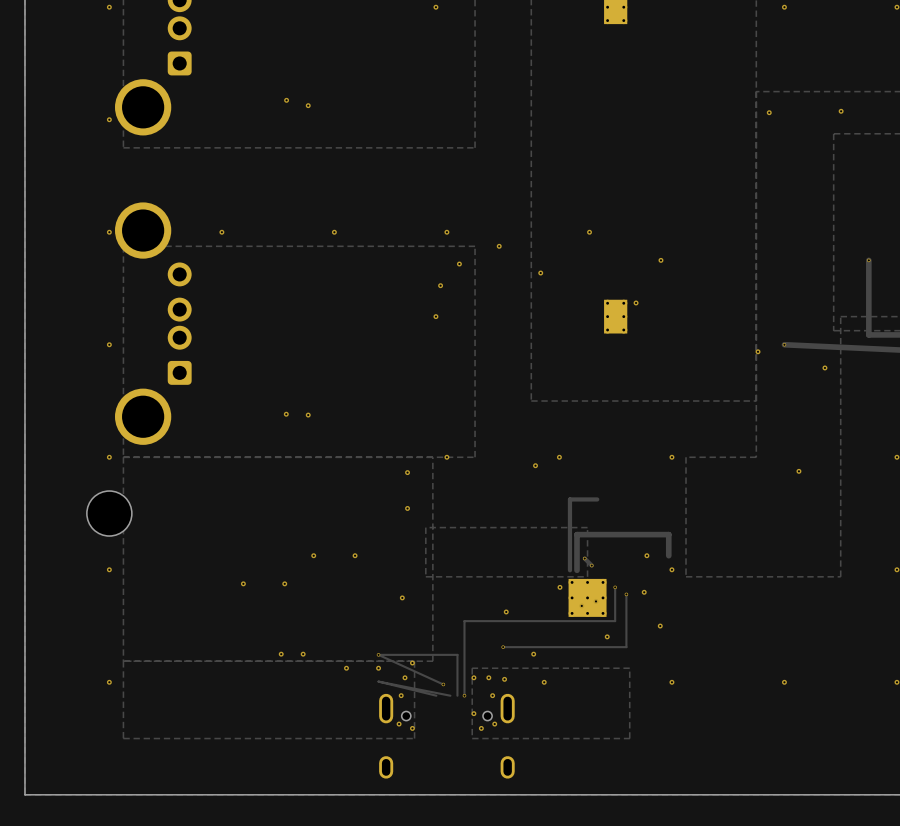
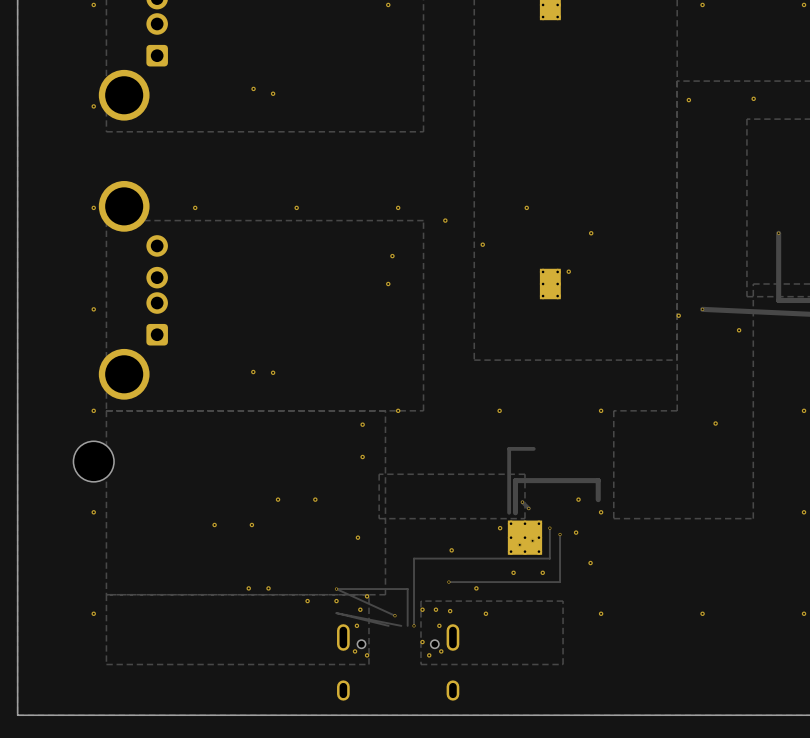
via: (459, 264) -> none
via: (535, 465) -> none
via: none -> (513, 572)

